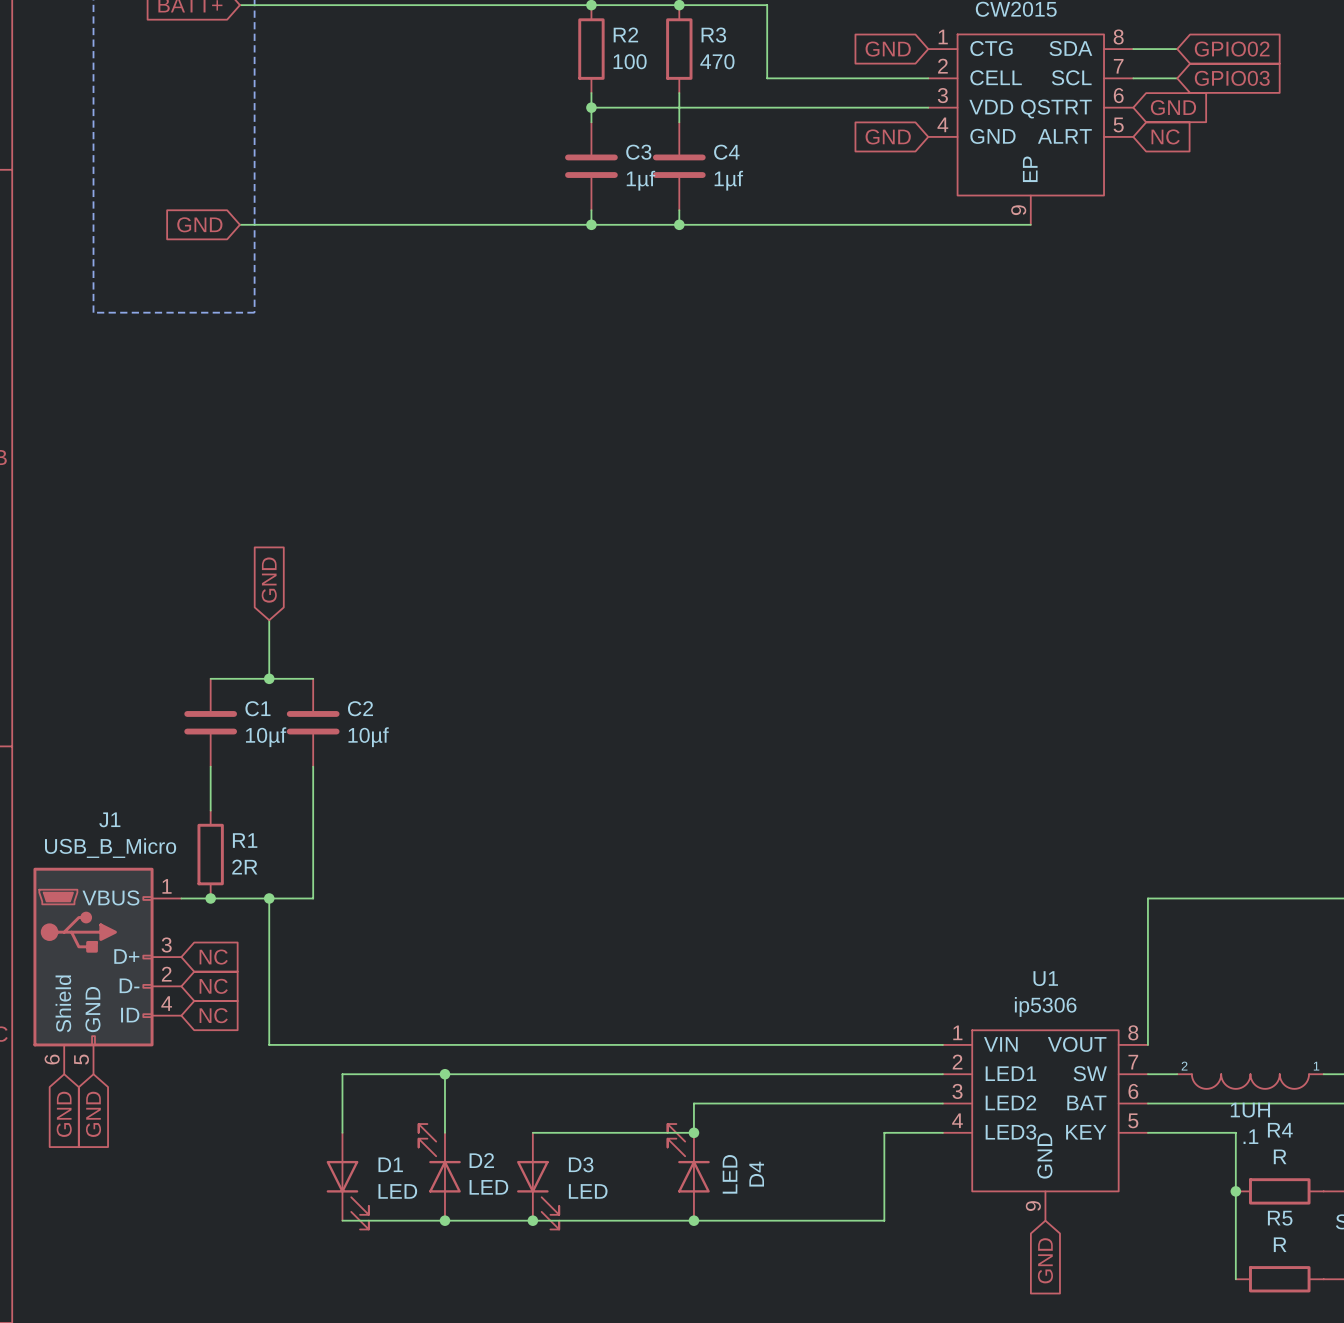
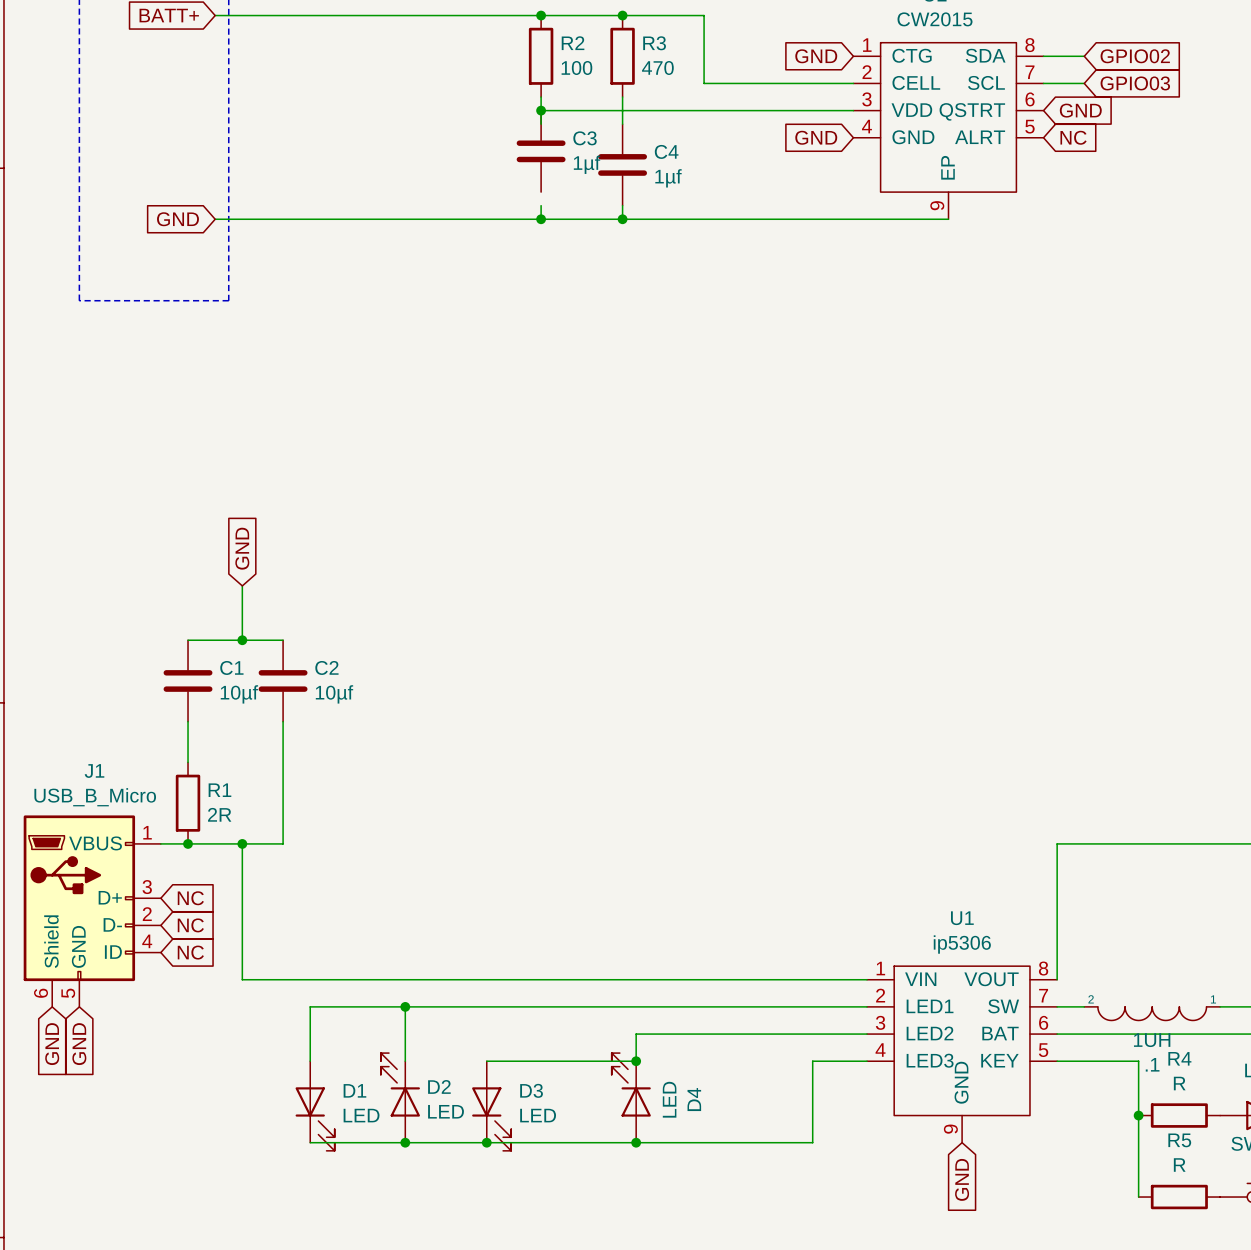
C3 position: (591, 166) -> (541, 151)

